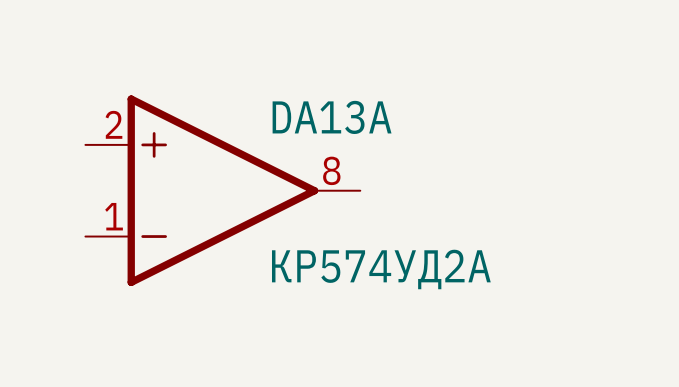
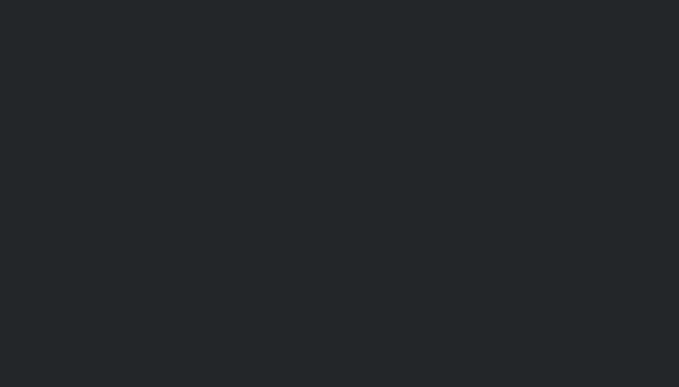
DA13A: КР574УД2А (222, 190) -> none

